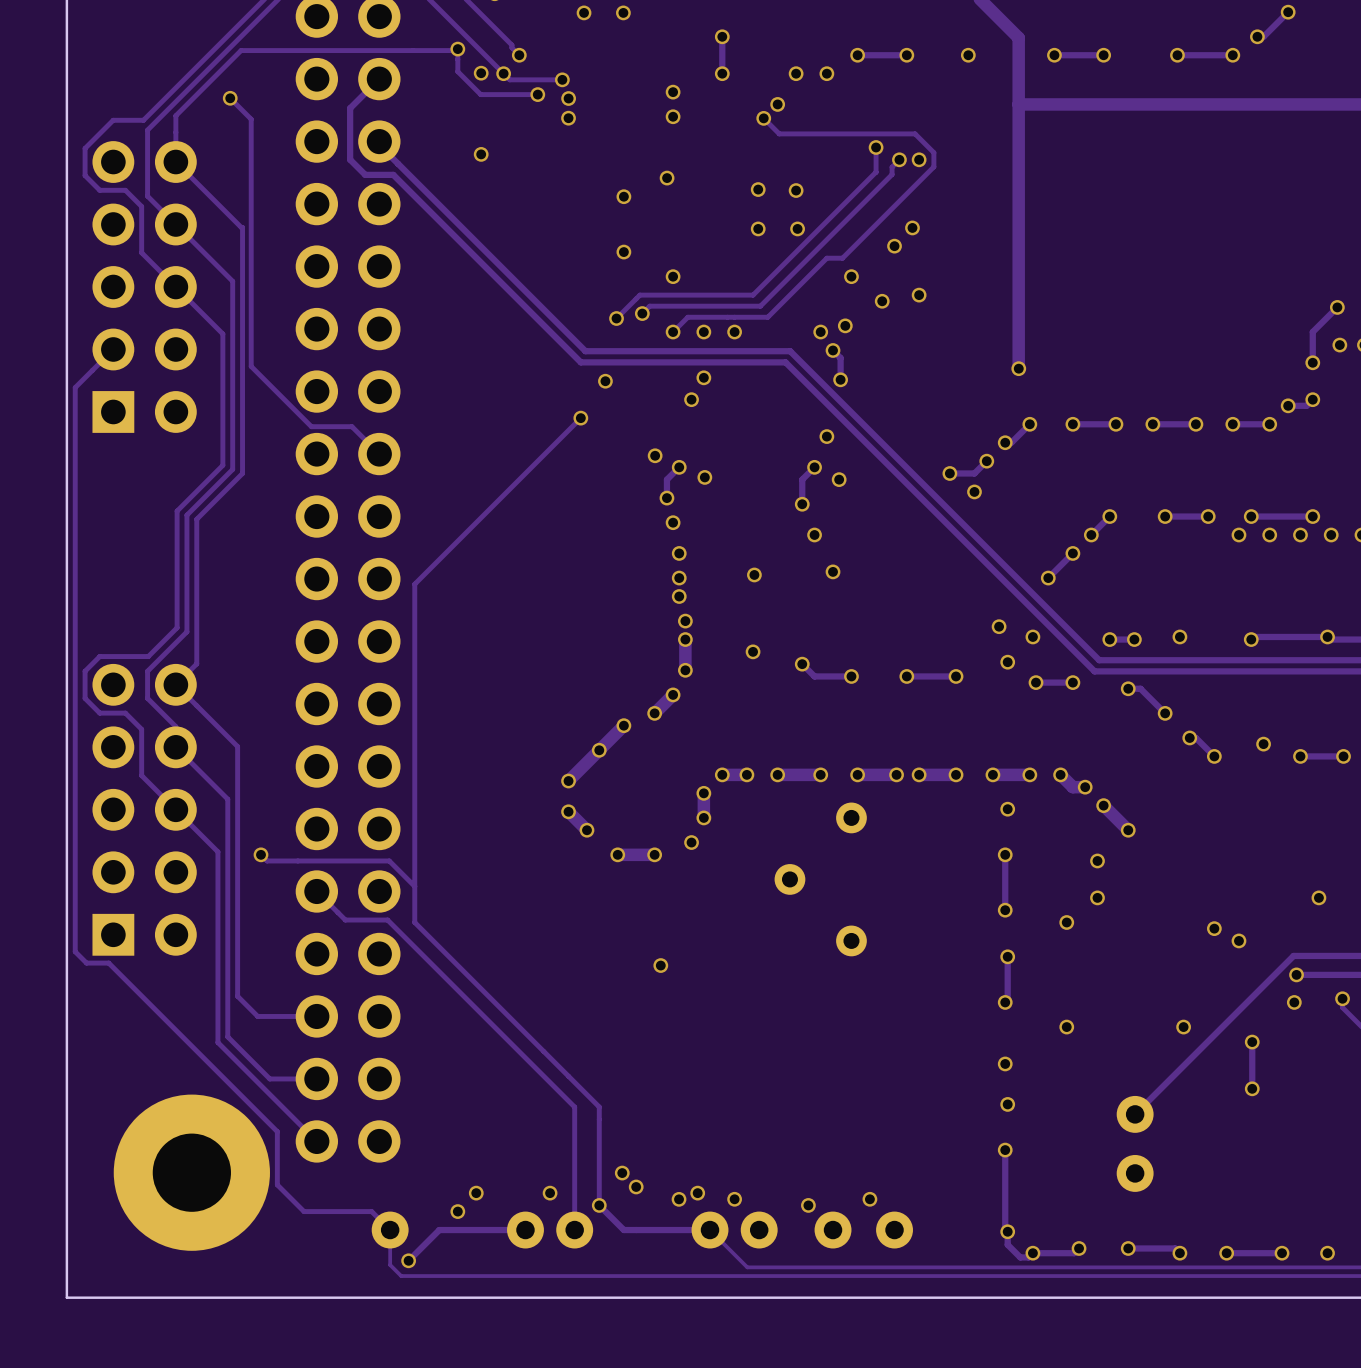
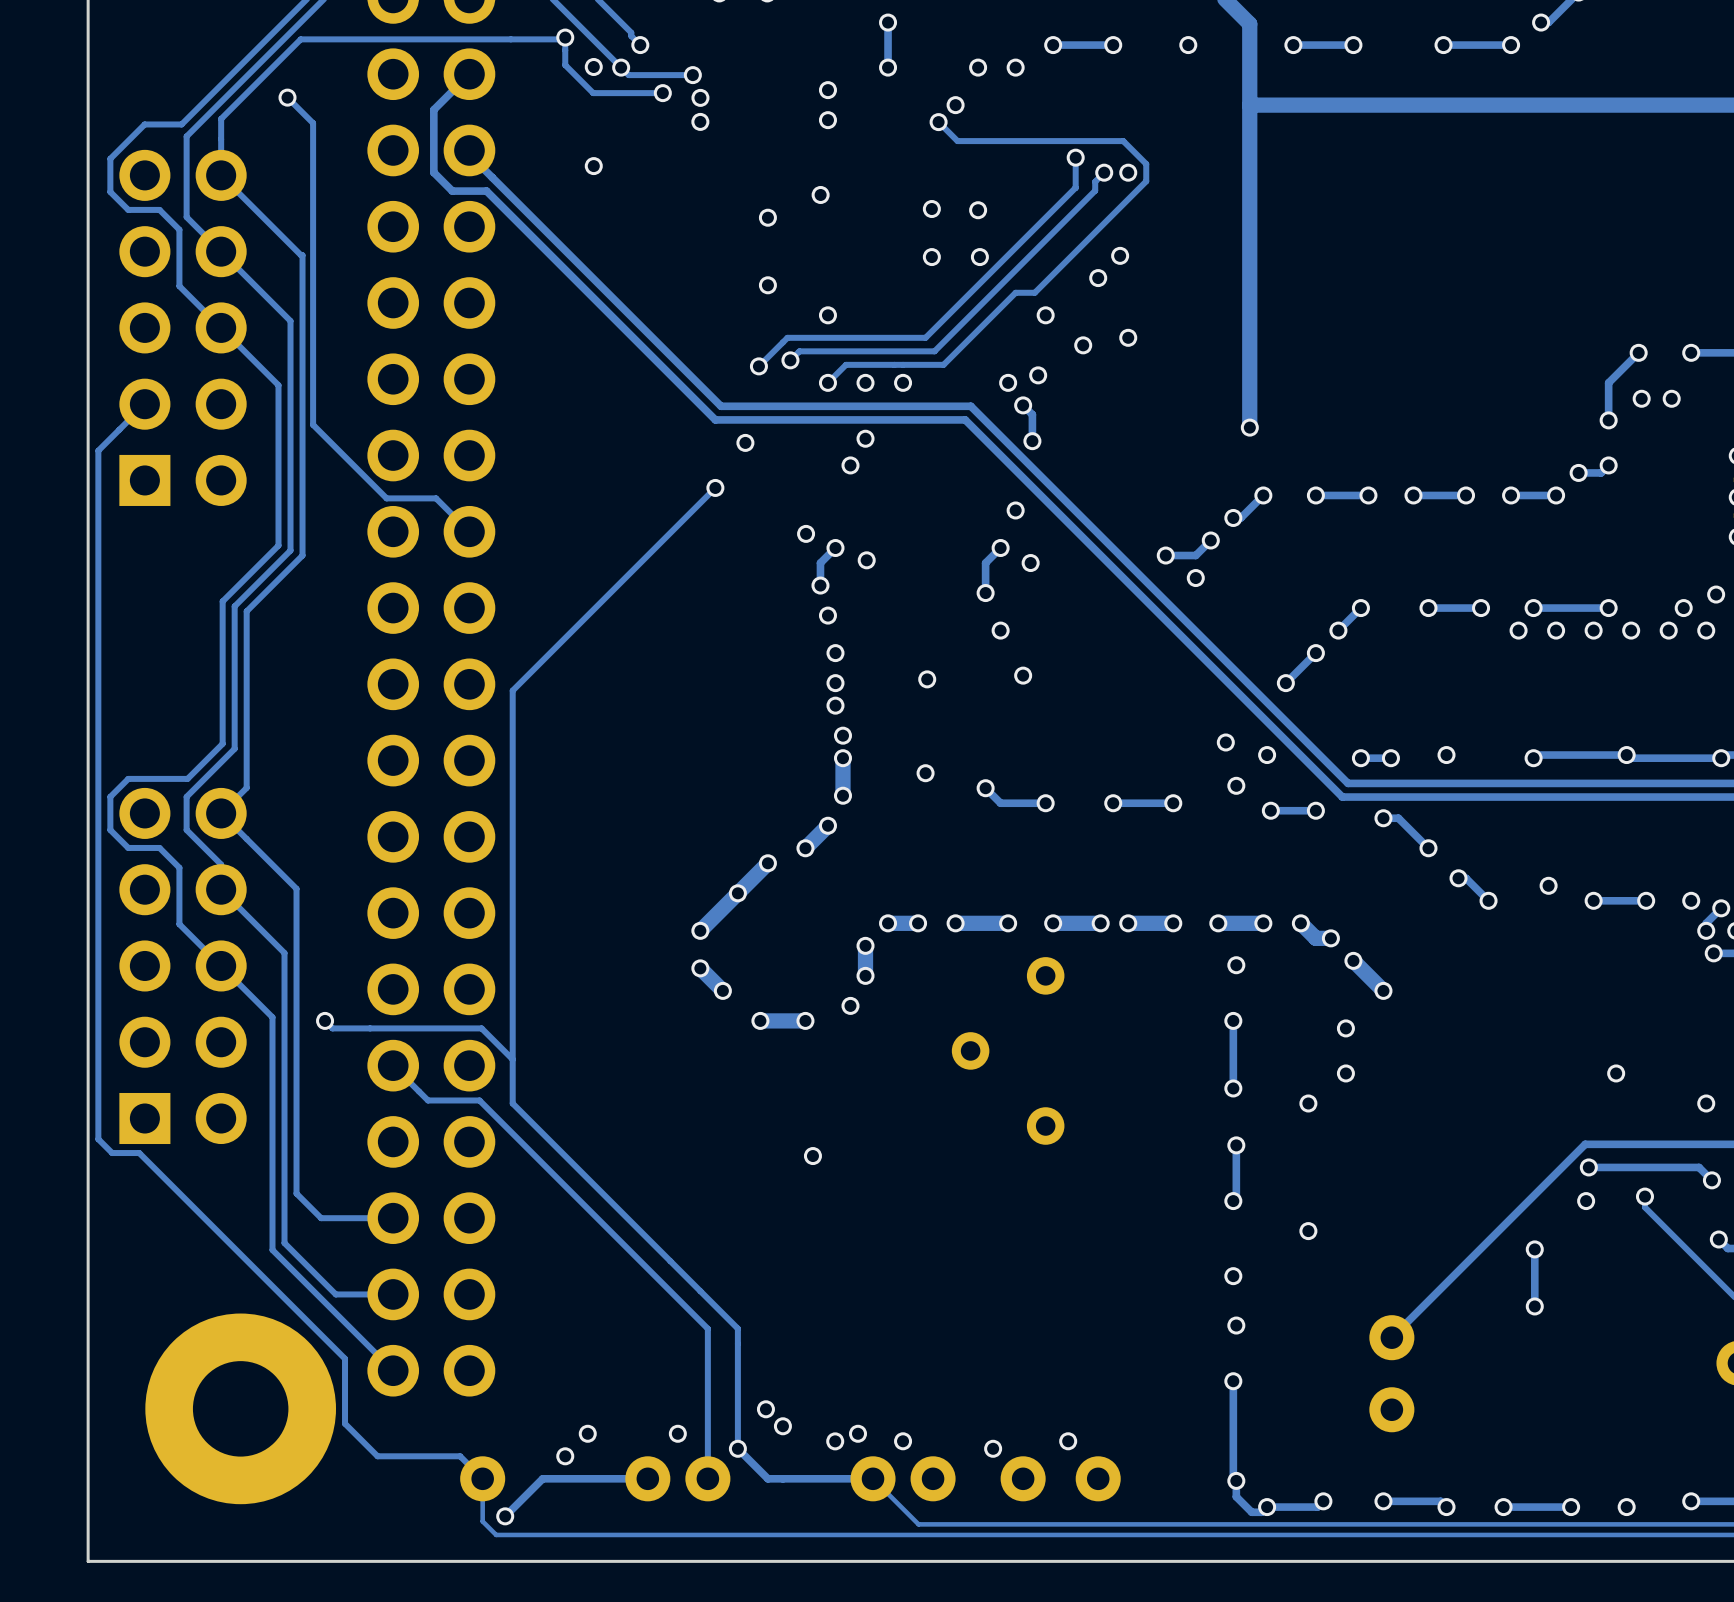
via: (1214, 928) -> none
via: (1238, 940) -> none
via: (1183, 1027) -> none

